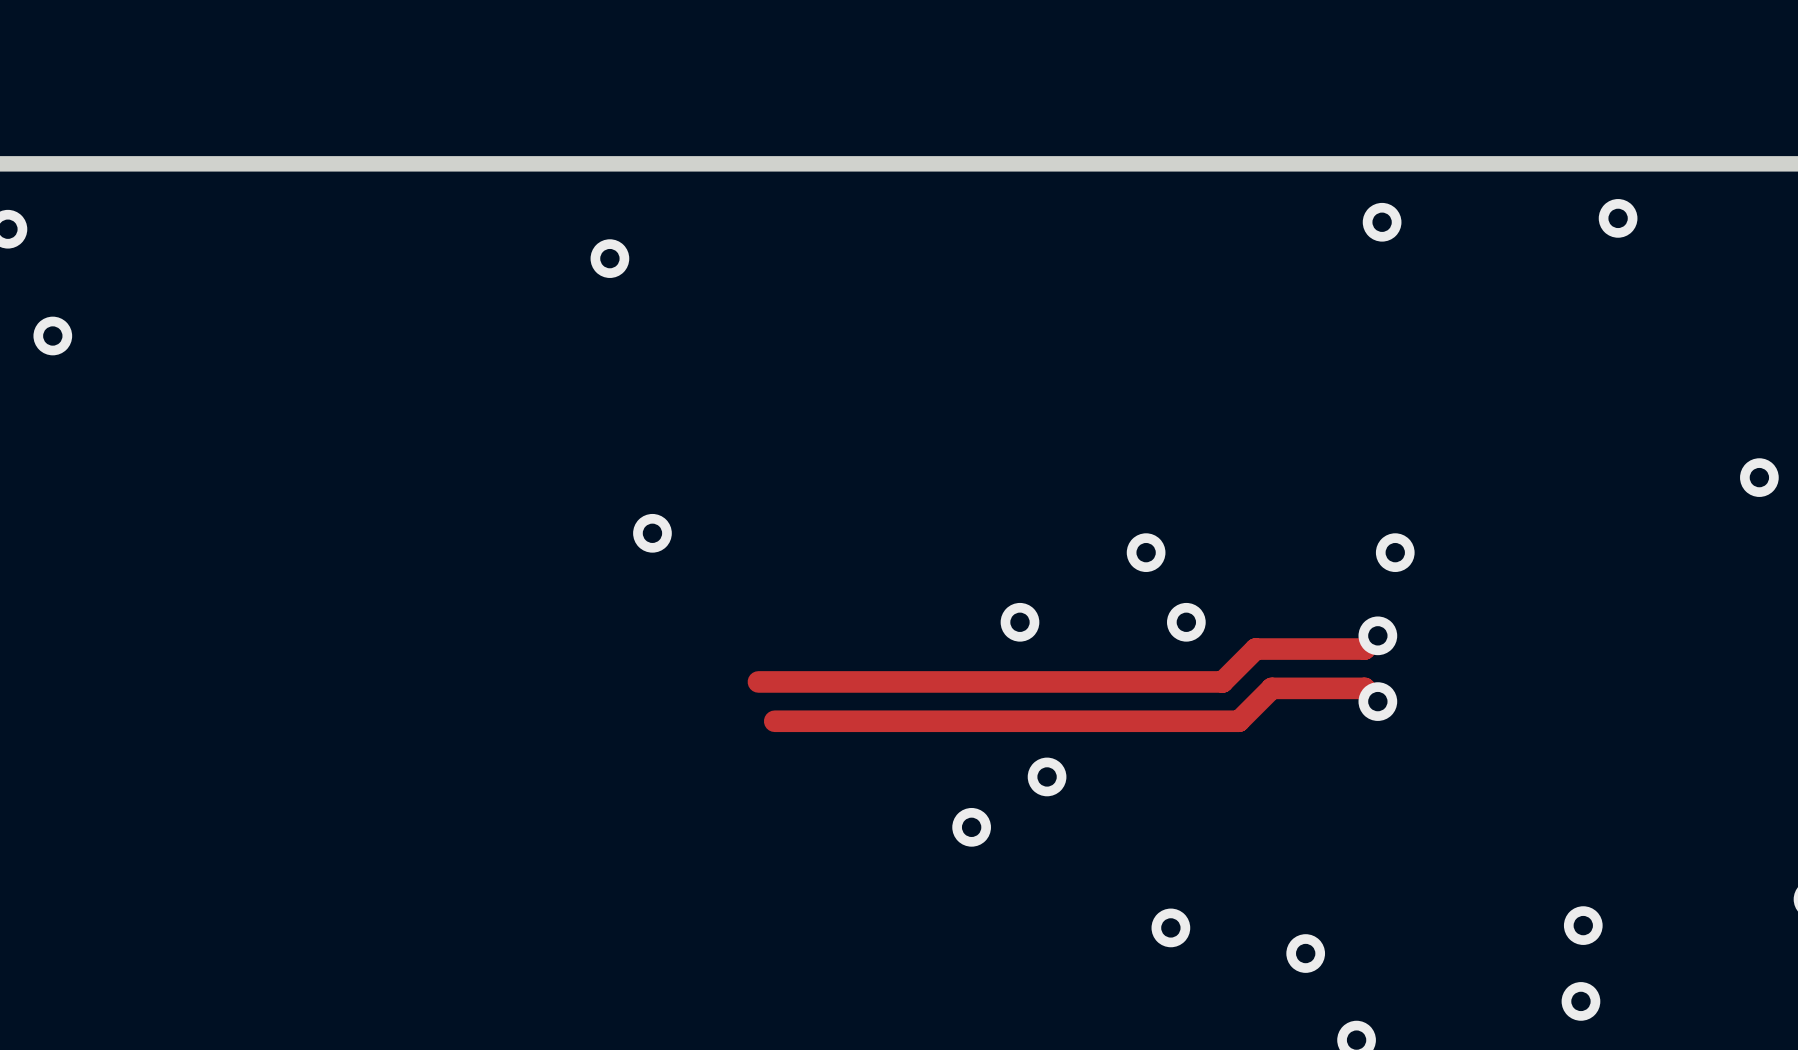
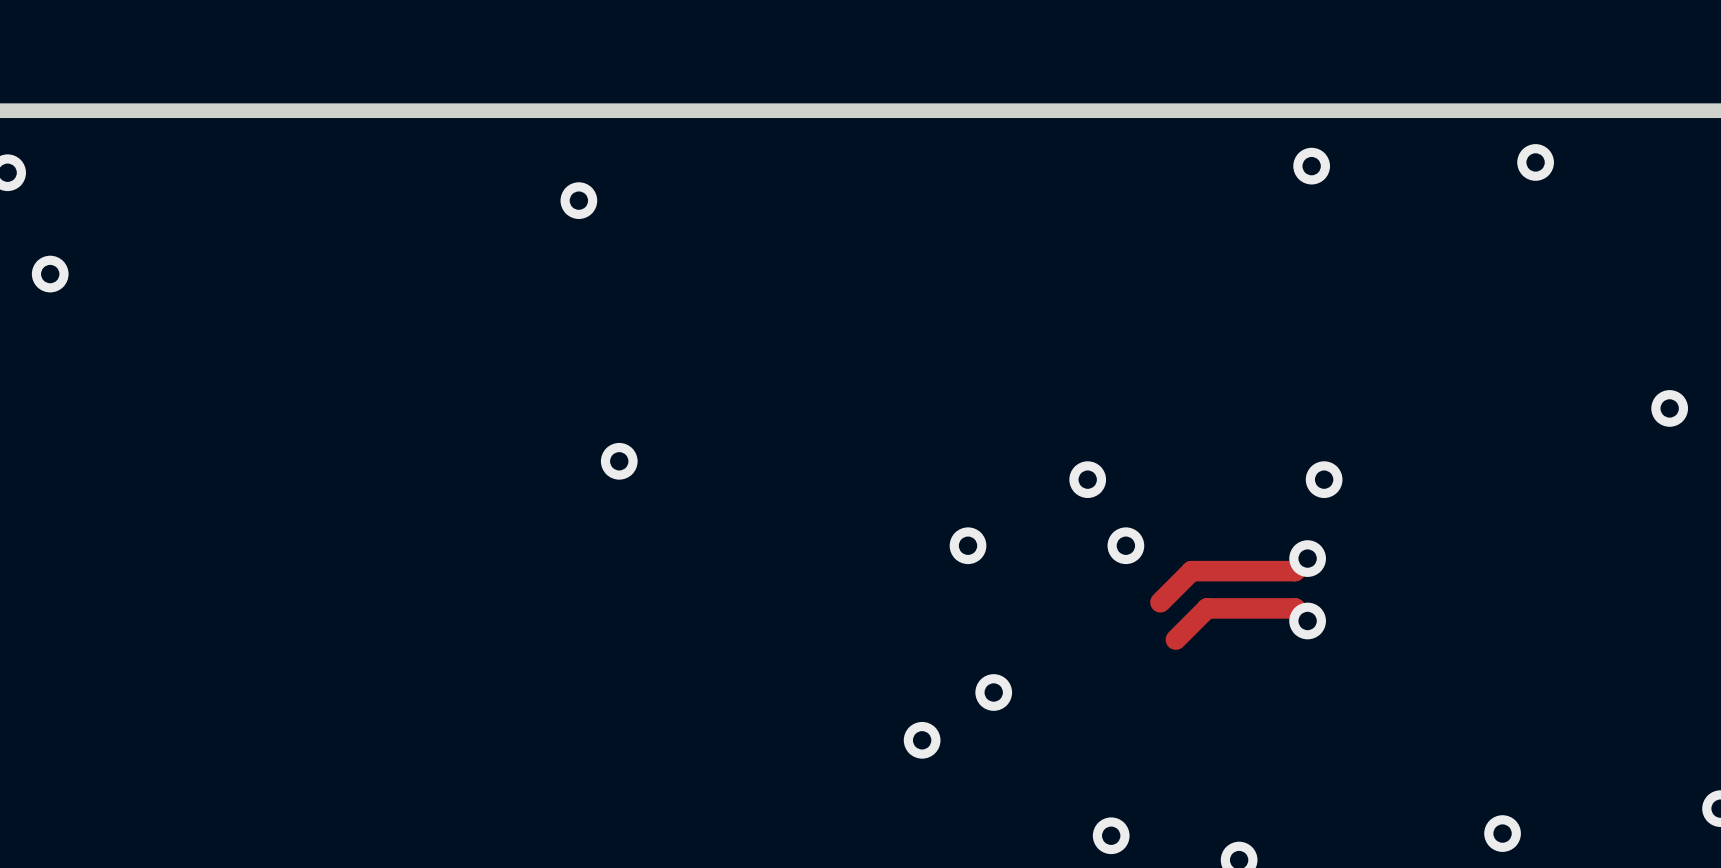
track: (758, 681) (1222, 681) -> none
track: (774, 721) (1238, 721) -> none

